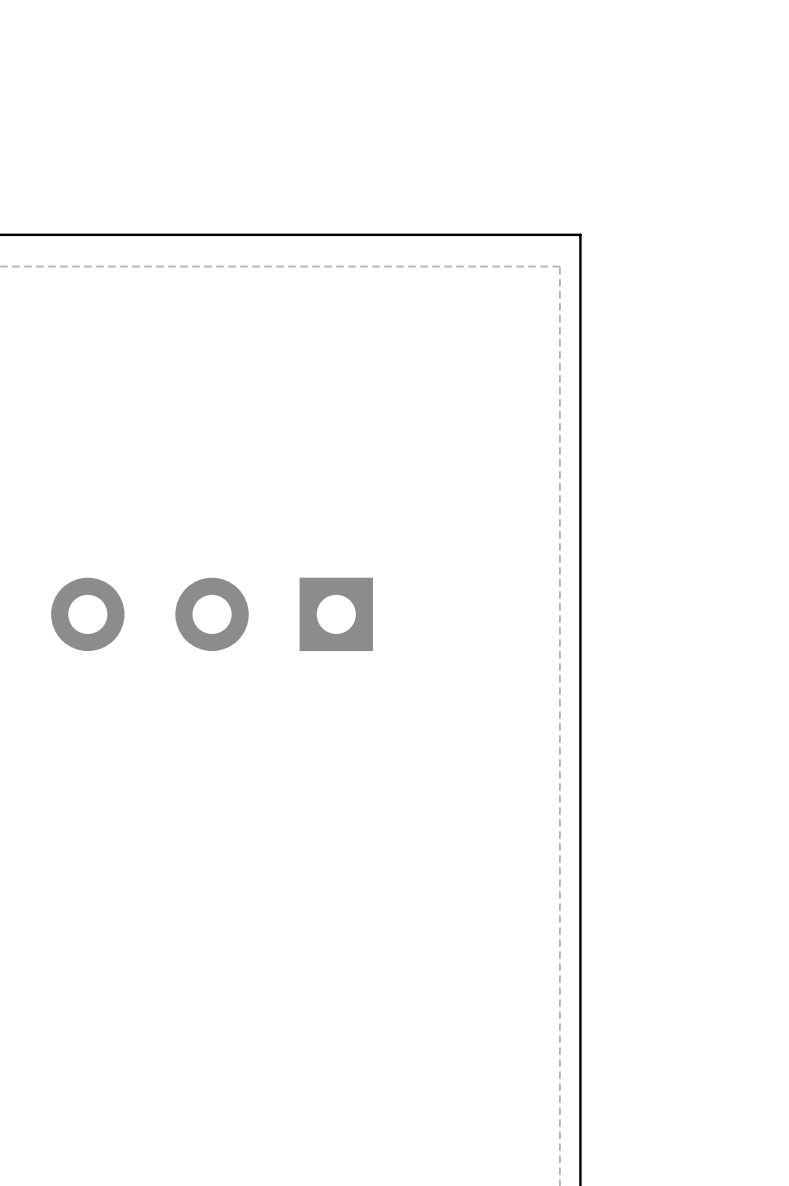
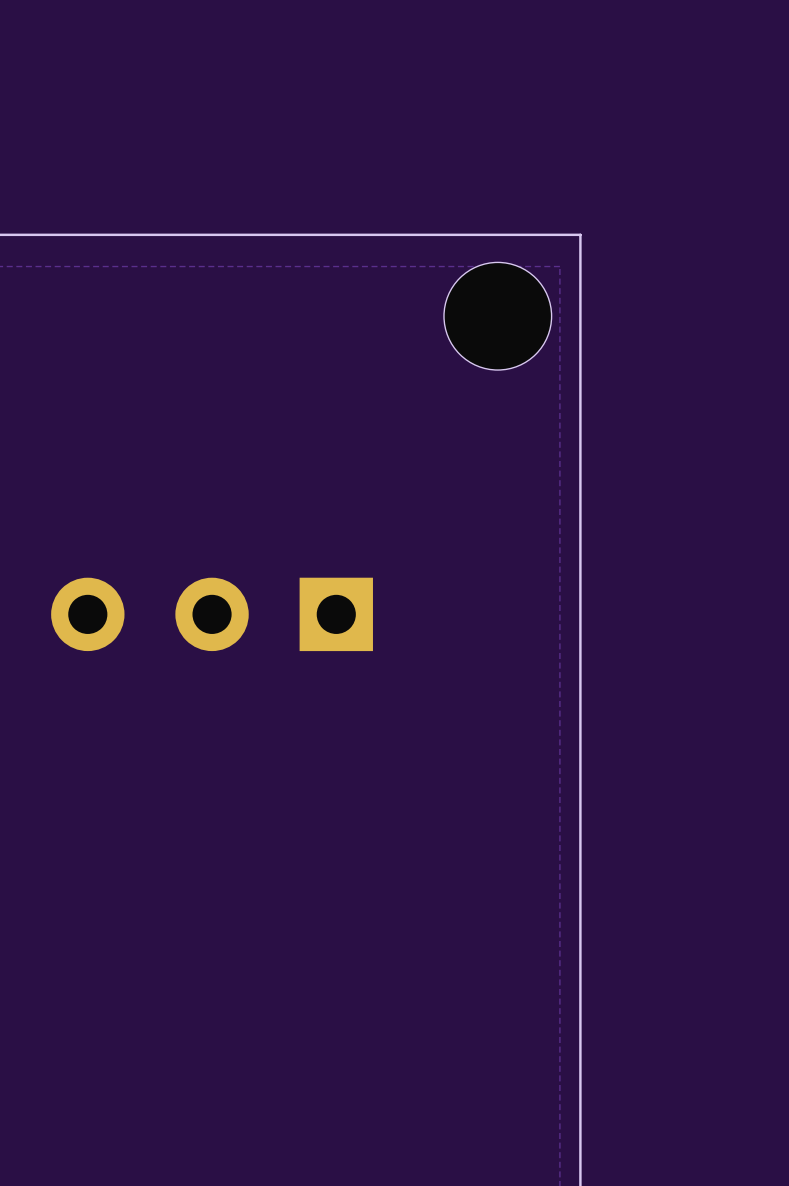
part: none -> (497, 316)

